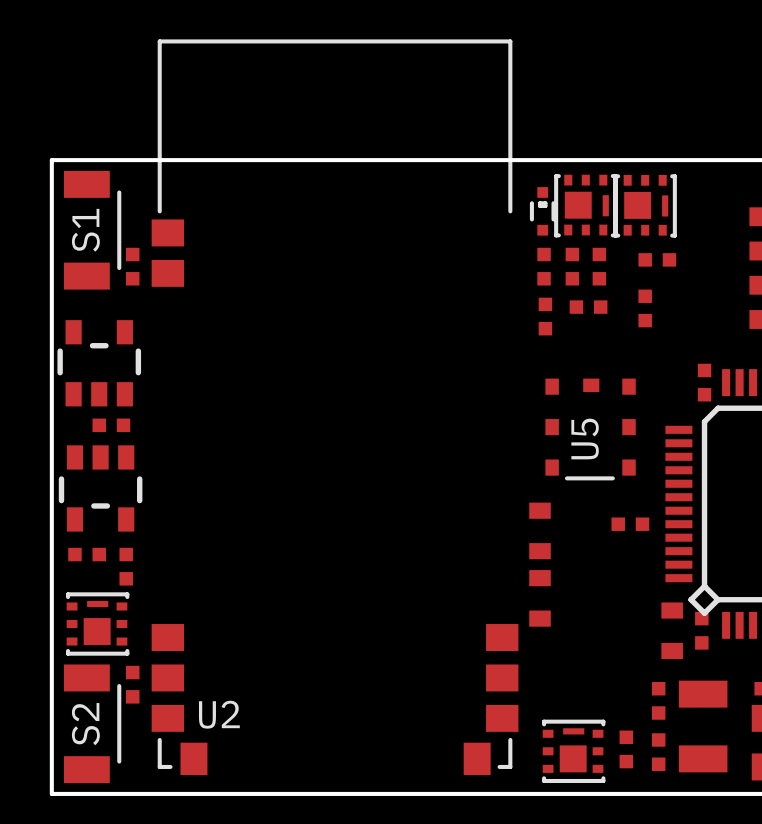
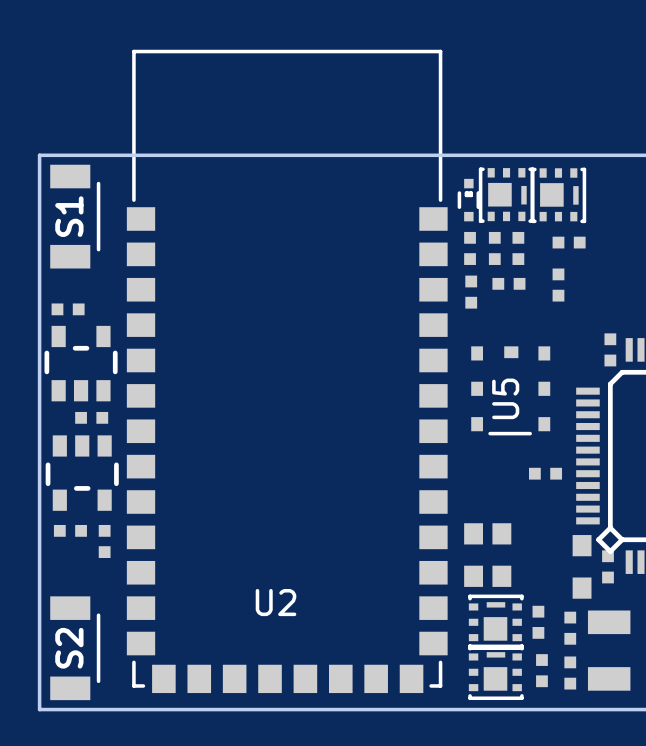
U2 footprint: [151, 39, 519, 776] -> [126, 49, 448, 694]
part: (132, 266) -> none
part: none -> (68, 309)
part position: (99, 363) -> (81, 363)
part position: (111, 425) -> (91, 417)
part position: (100, 488) -> (82, 473)
part: (540, 530) -> none
part: (87, 554) -> none
part: (126, 566) -> none
part footprint: [529, 570, 551, 627] -> [464, 523, 484, 587]
part: none -> (70, 530)
part: none -> (104, 541)
part footprint: [661, 602, 683, 660] -> [572, 535, 592, 599]
part: none -> (501, 555)
part position: (97, 624) -> (495, 622)
part: (132, 684) -> none
part: none -> (538, 622)
U2 name position: U2 (219, 714) -> U2 (276, 602)

